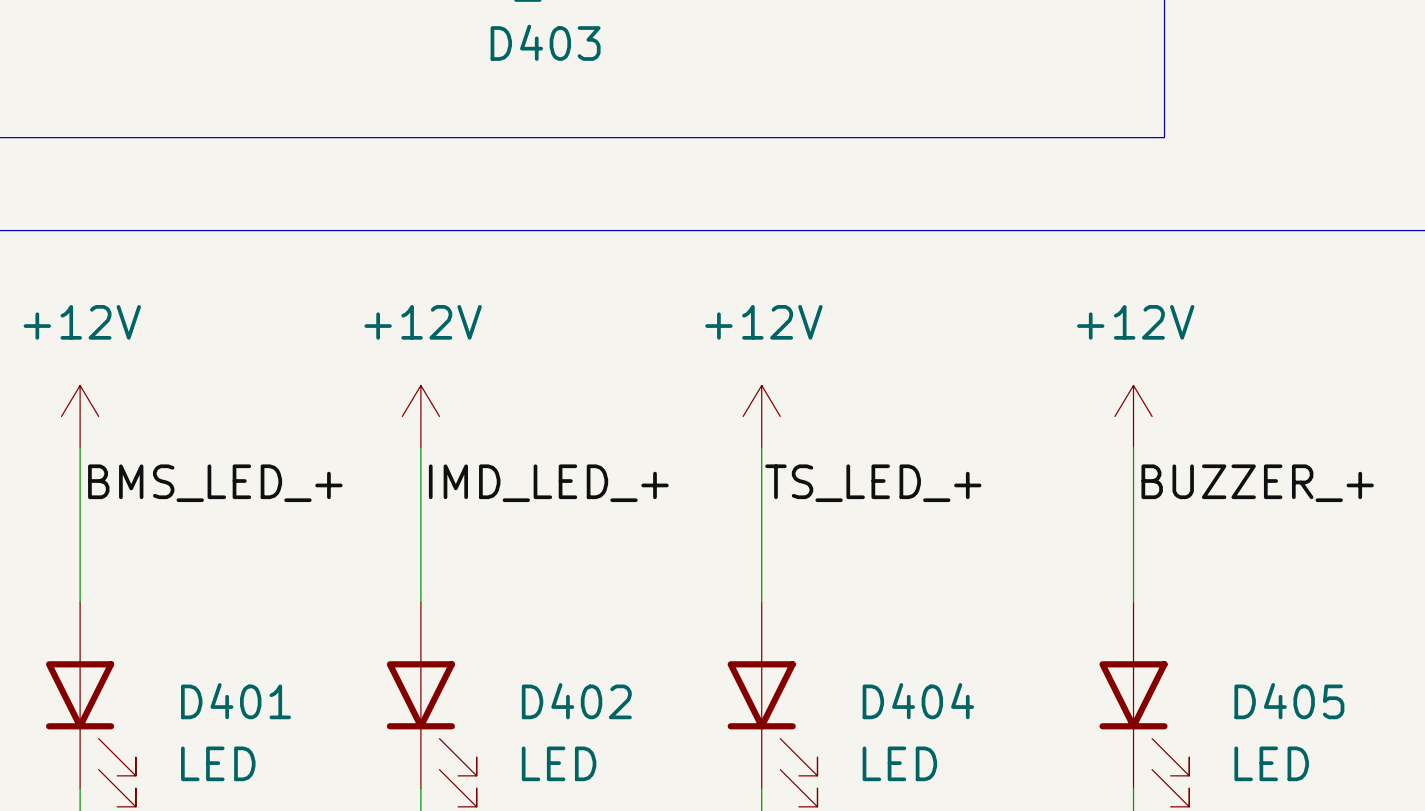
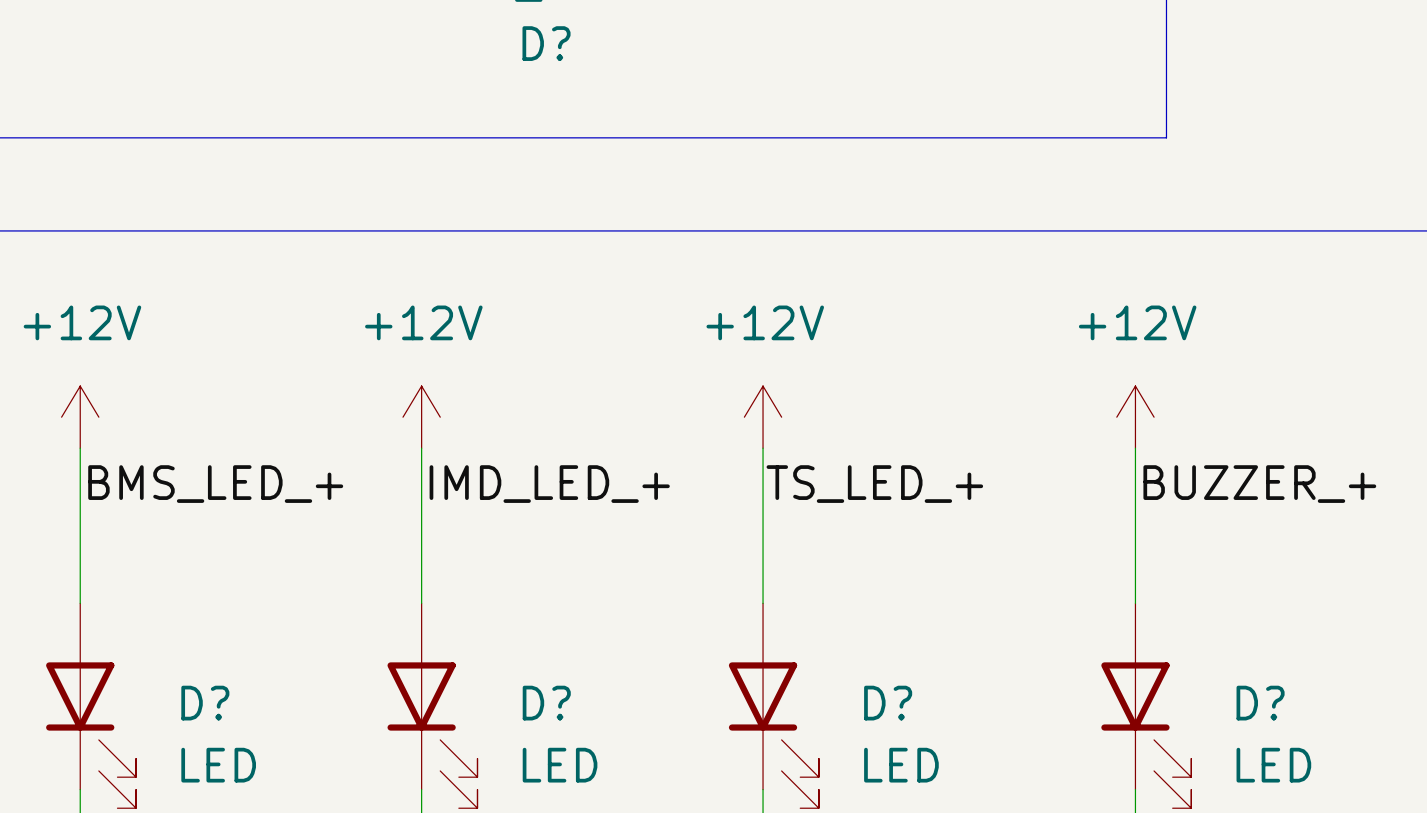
D403 name: D403 (545, 42) -> D? (546, 43)
D401 name: D401 (235, 701) -> D? (205, 703)
D402 name: D402 (576, 701) -> D? (546, 703)
D404 name: D404 (918, 701) -> D? (888, 703)
D405 name: D405 (1289, 701) -> D? (1260, 703)

